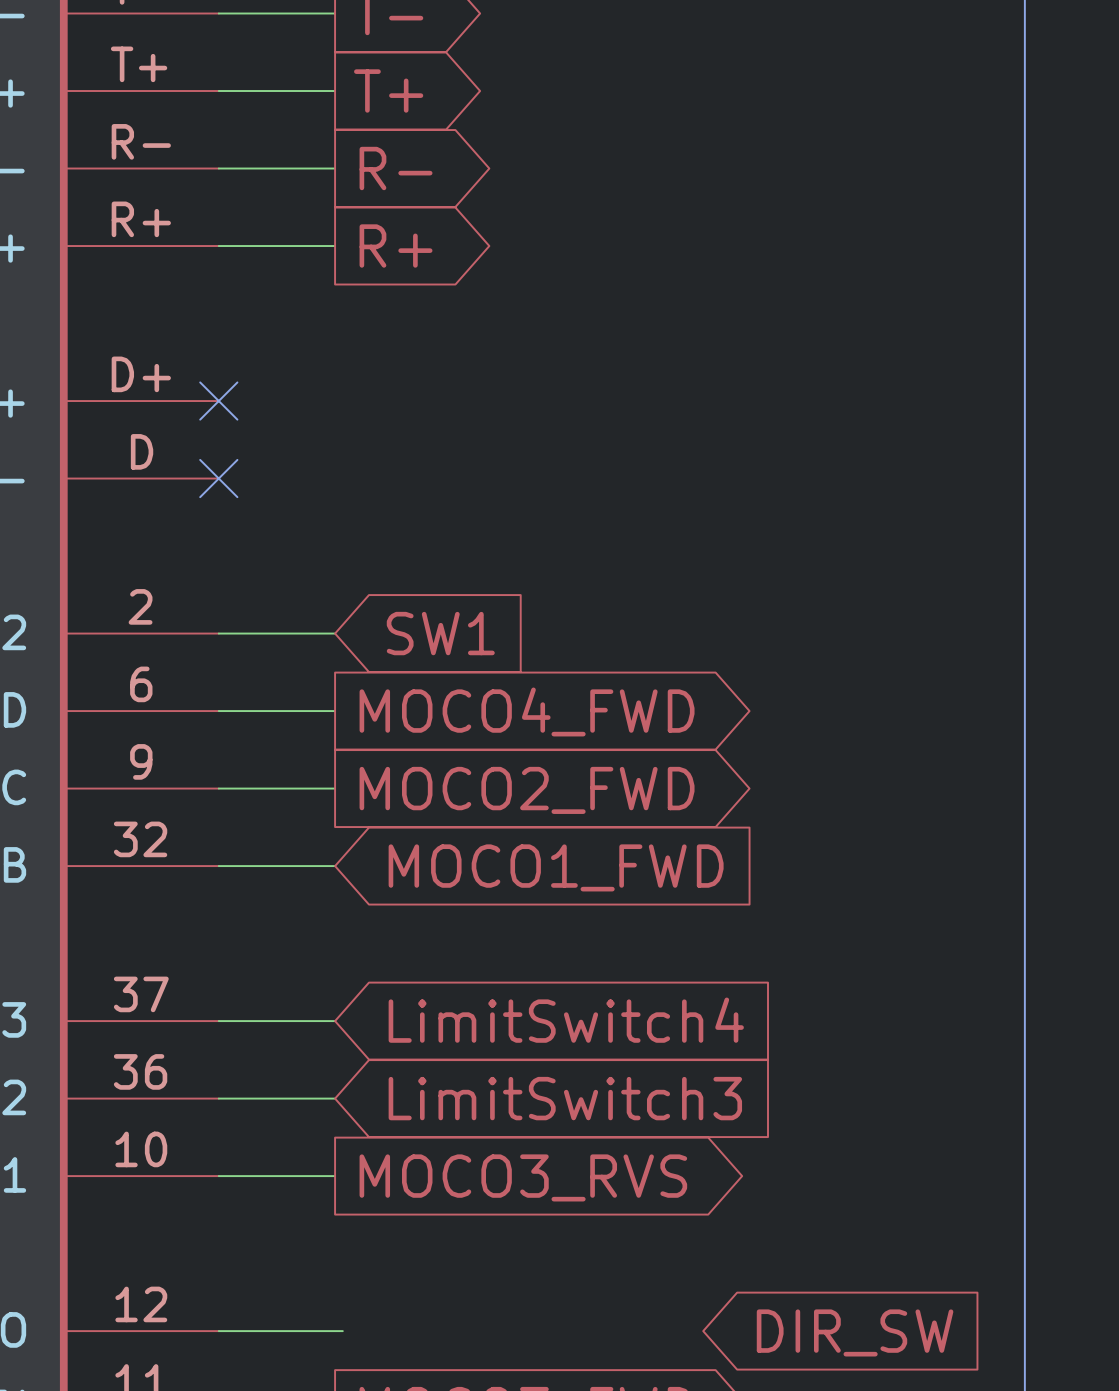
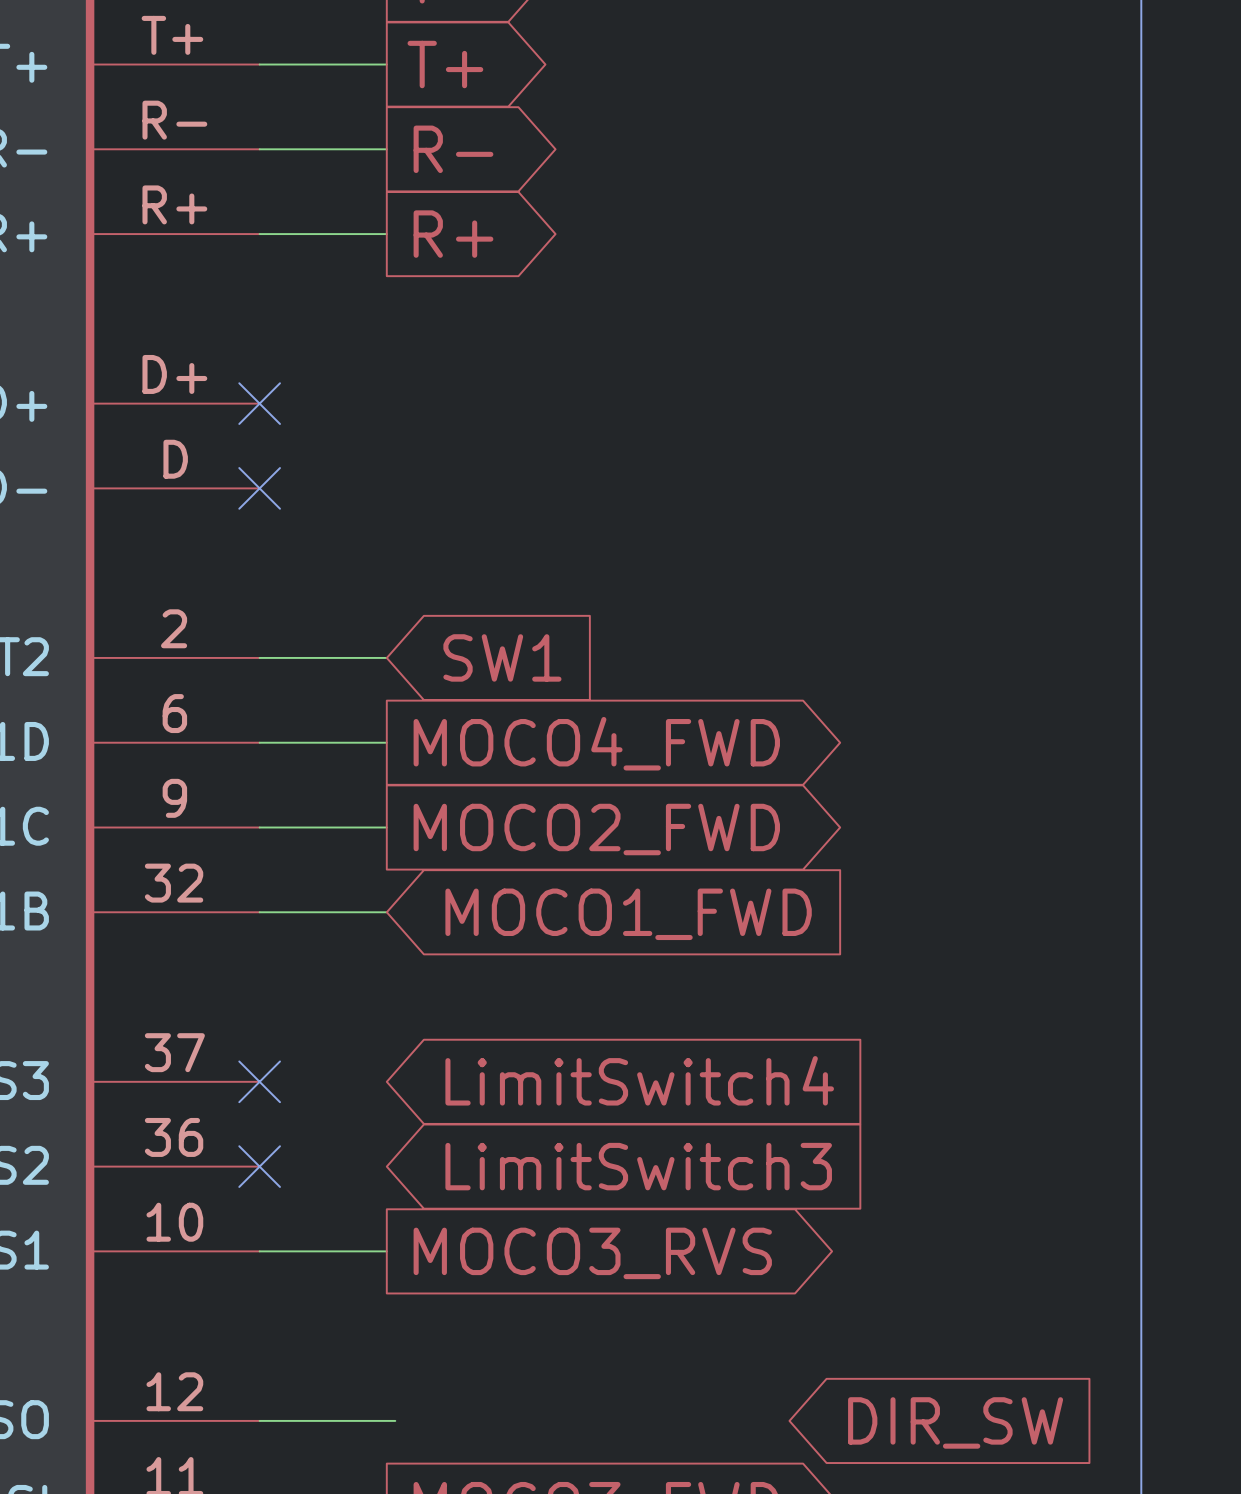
wire: (218, 1021) (335, 1021) -> none
no-connect mark: none -> (259, 1081)
wire: (218, 1098) (335, 1098) -> none
no-connect mark: none -> (259, 1166)

